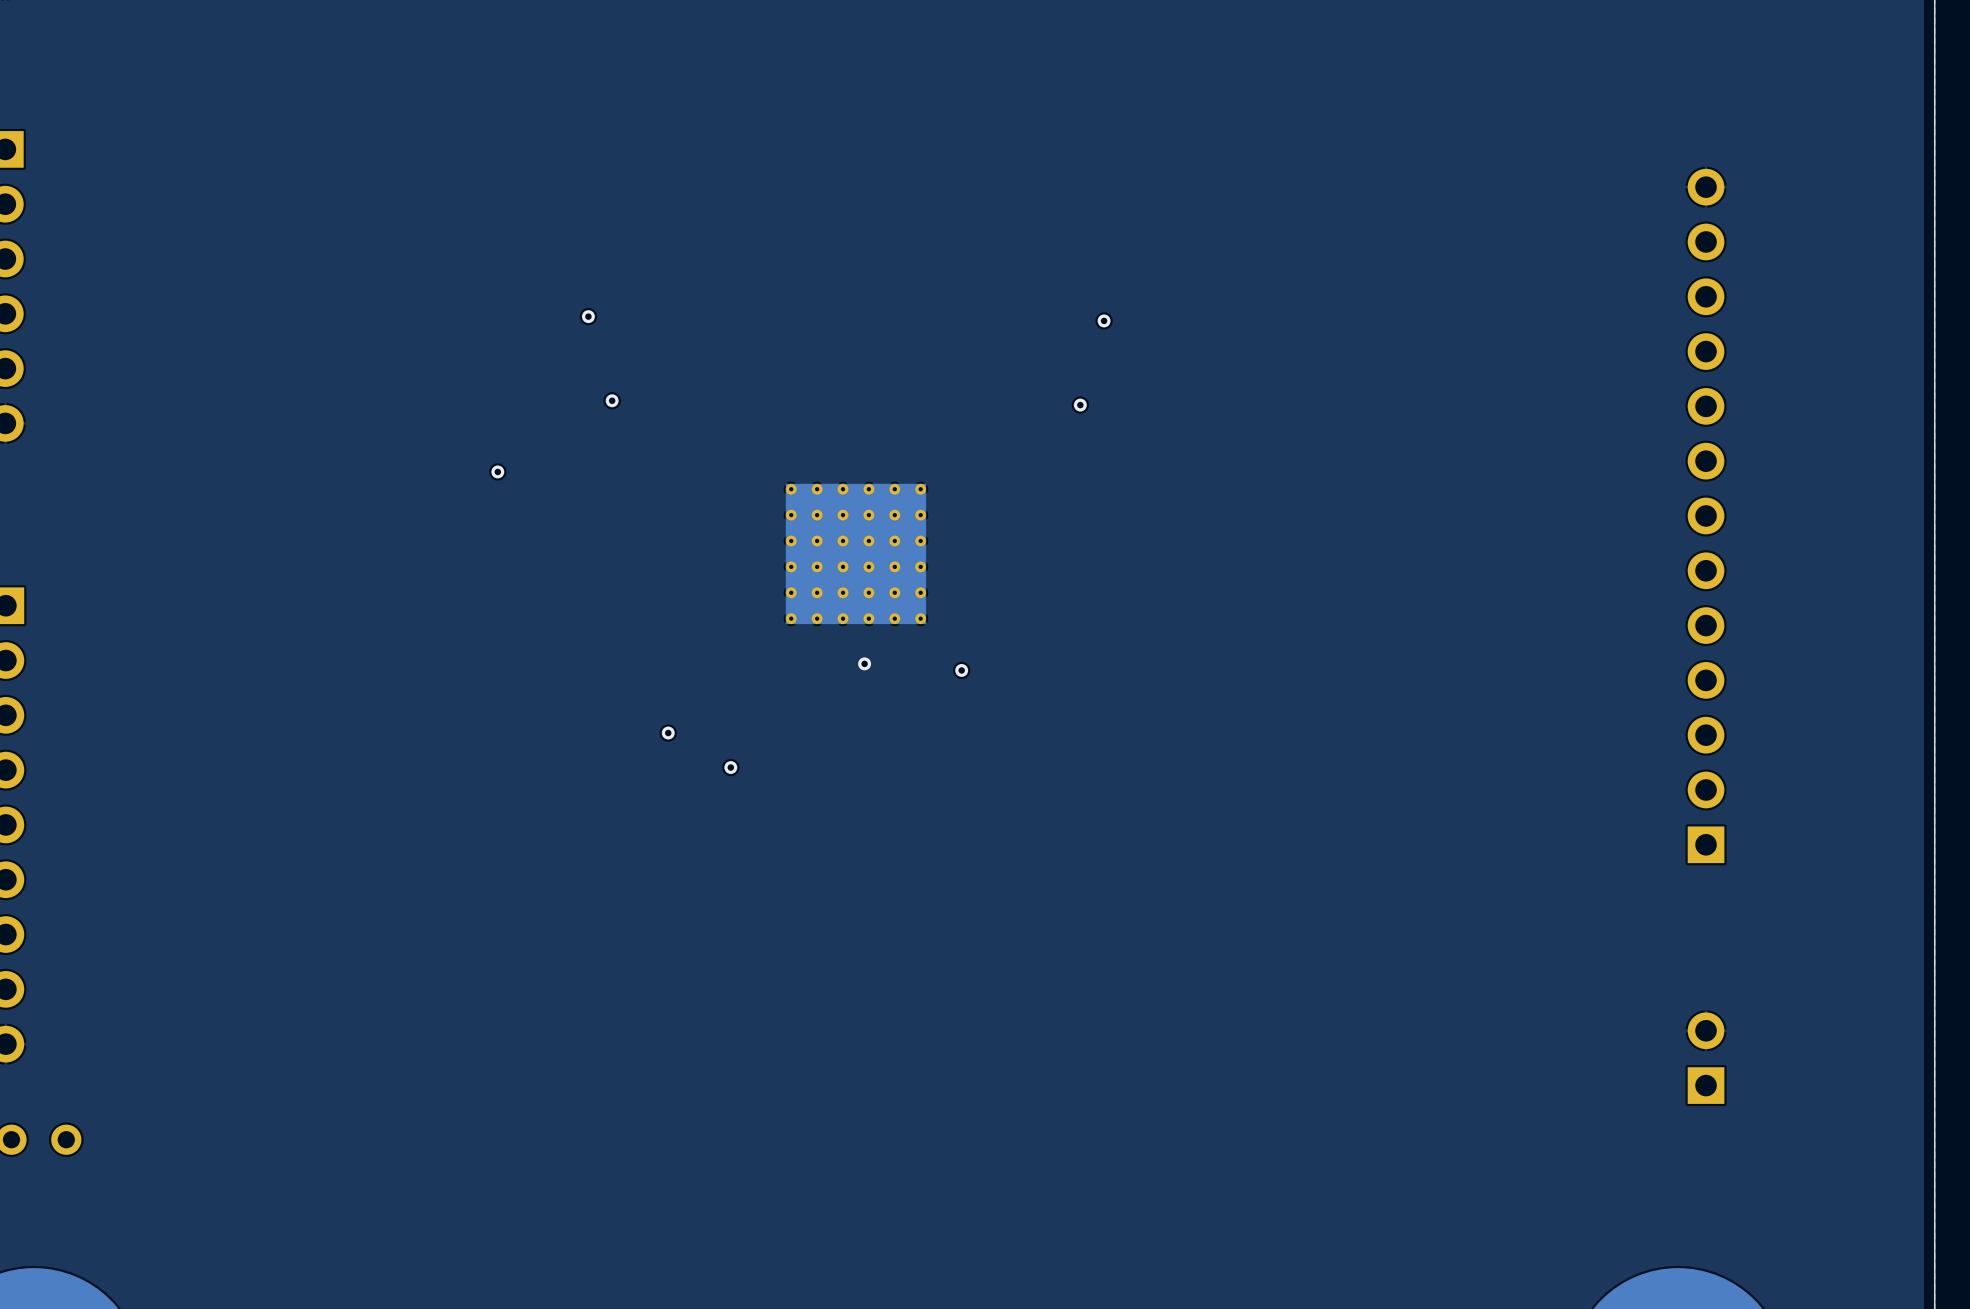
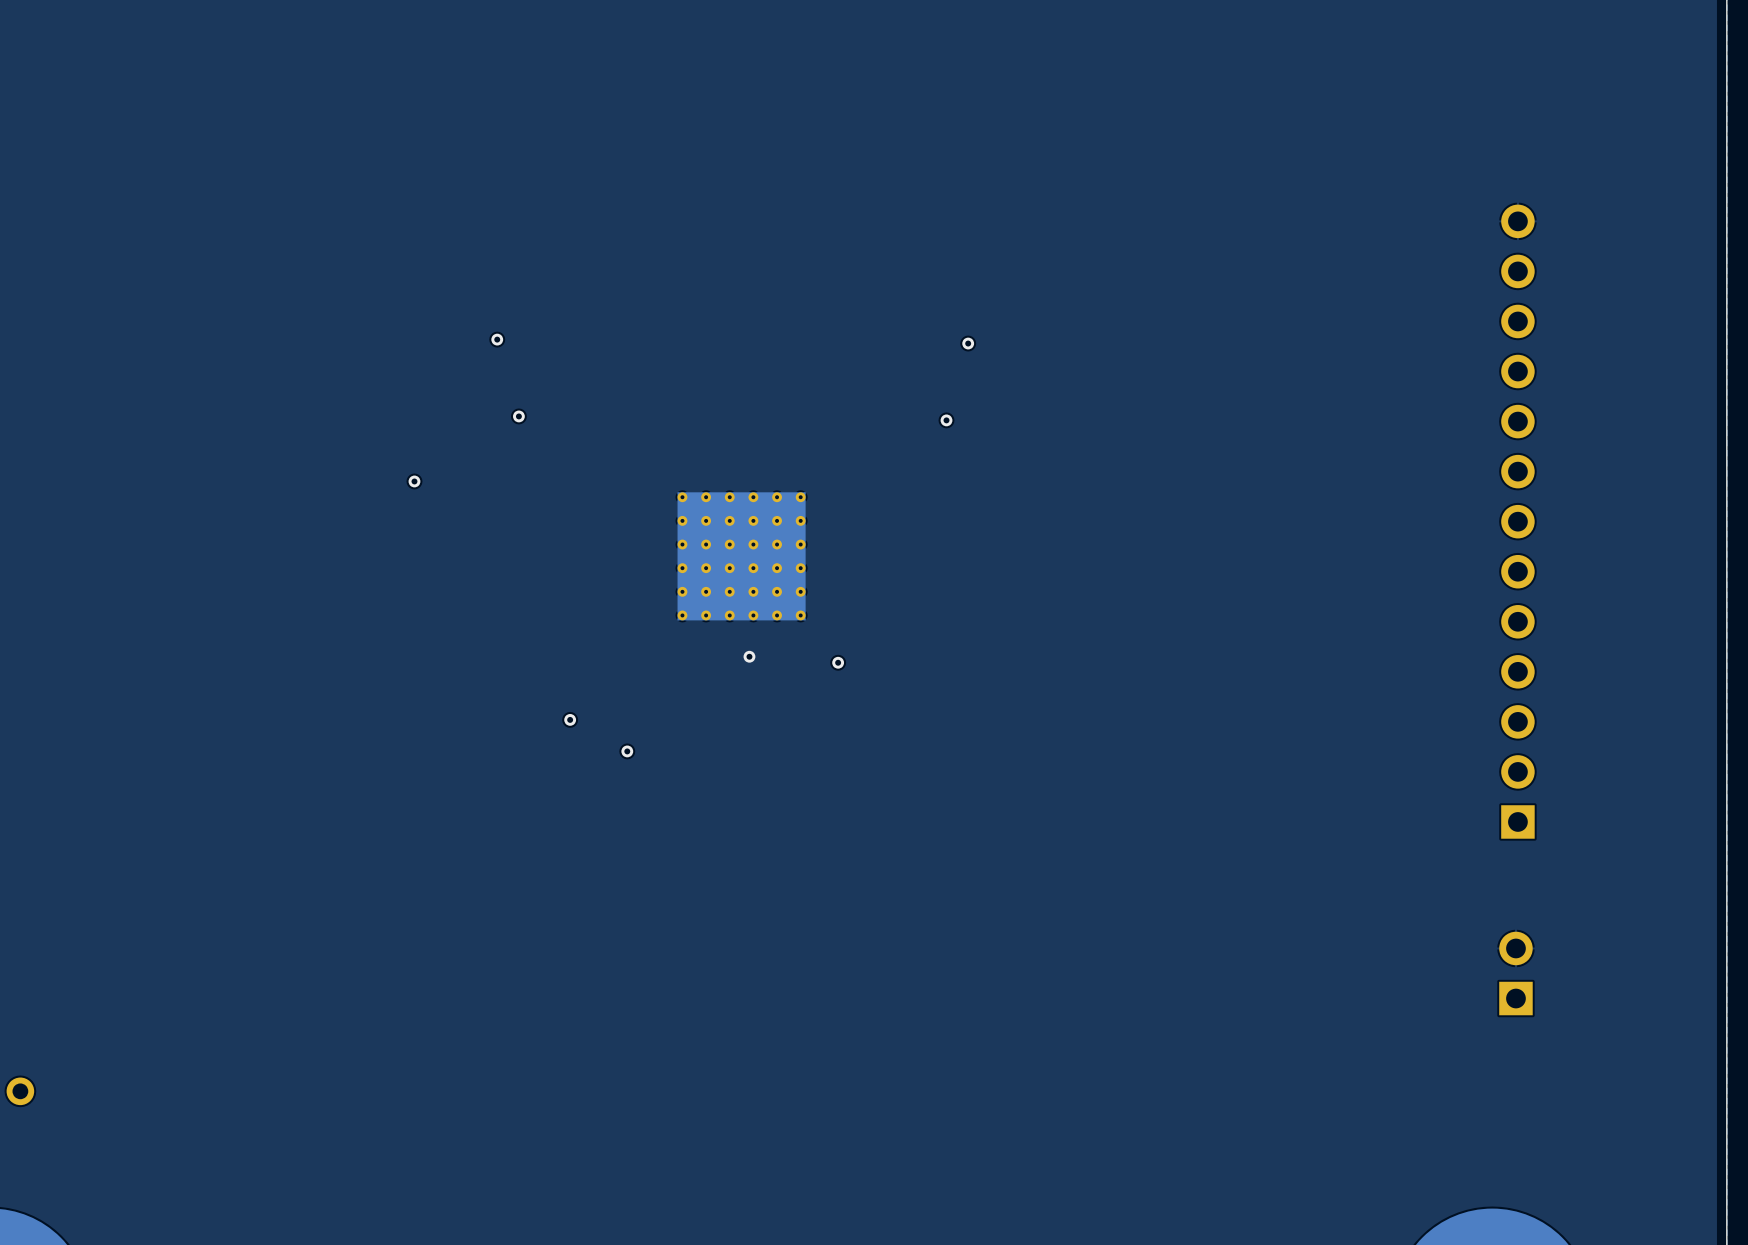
part position: (1706, 1058) -> (1515, 973)

